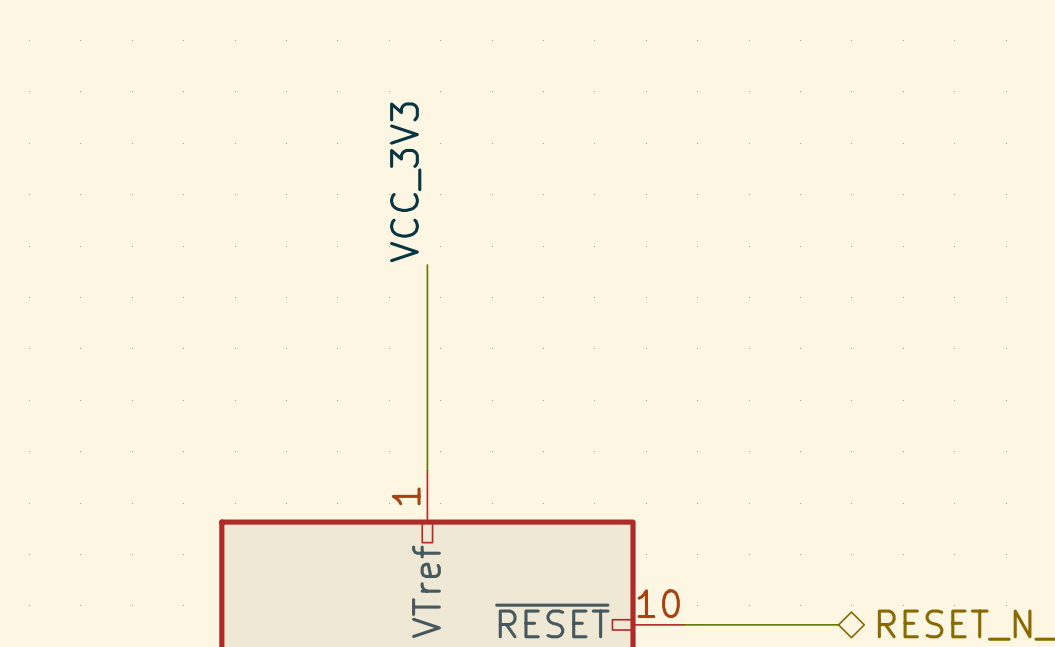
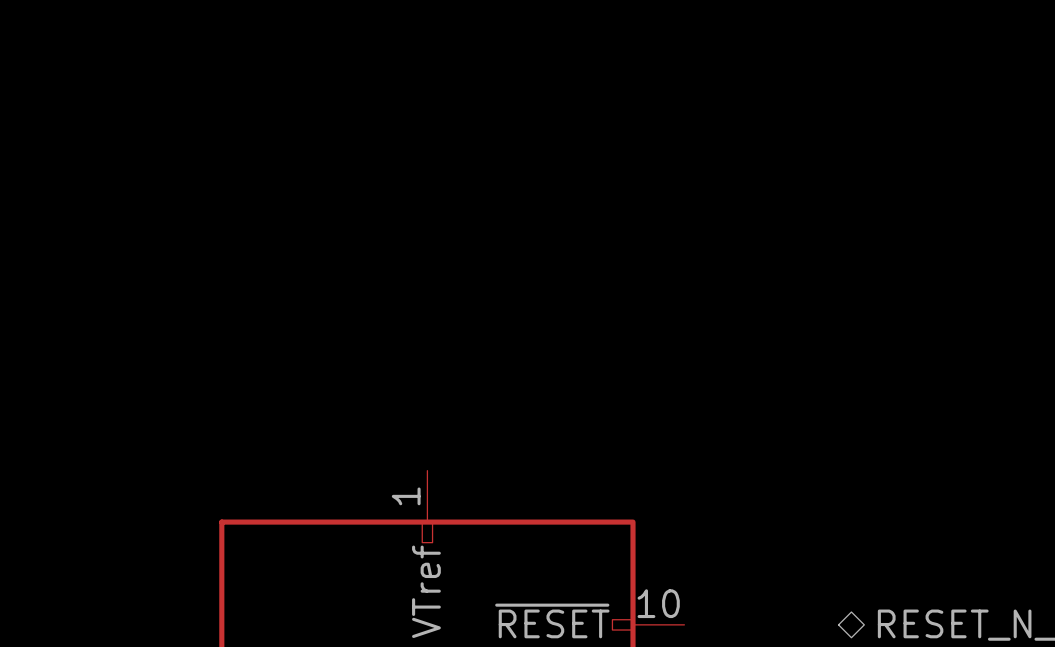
label: VCC_3V3 (405, 182) -> none
wire: (427, 265) (427, 470) -> none
wire: (684, 624) (838, 624) -> none

